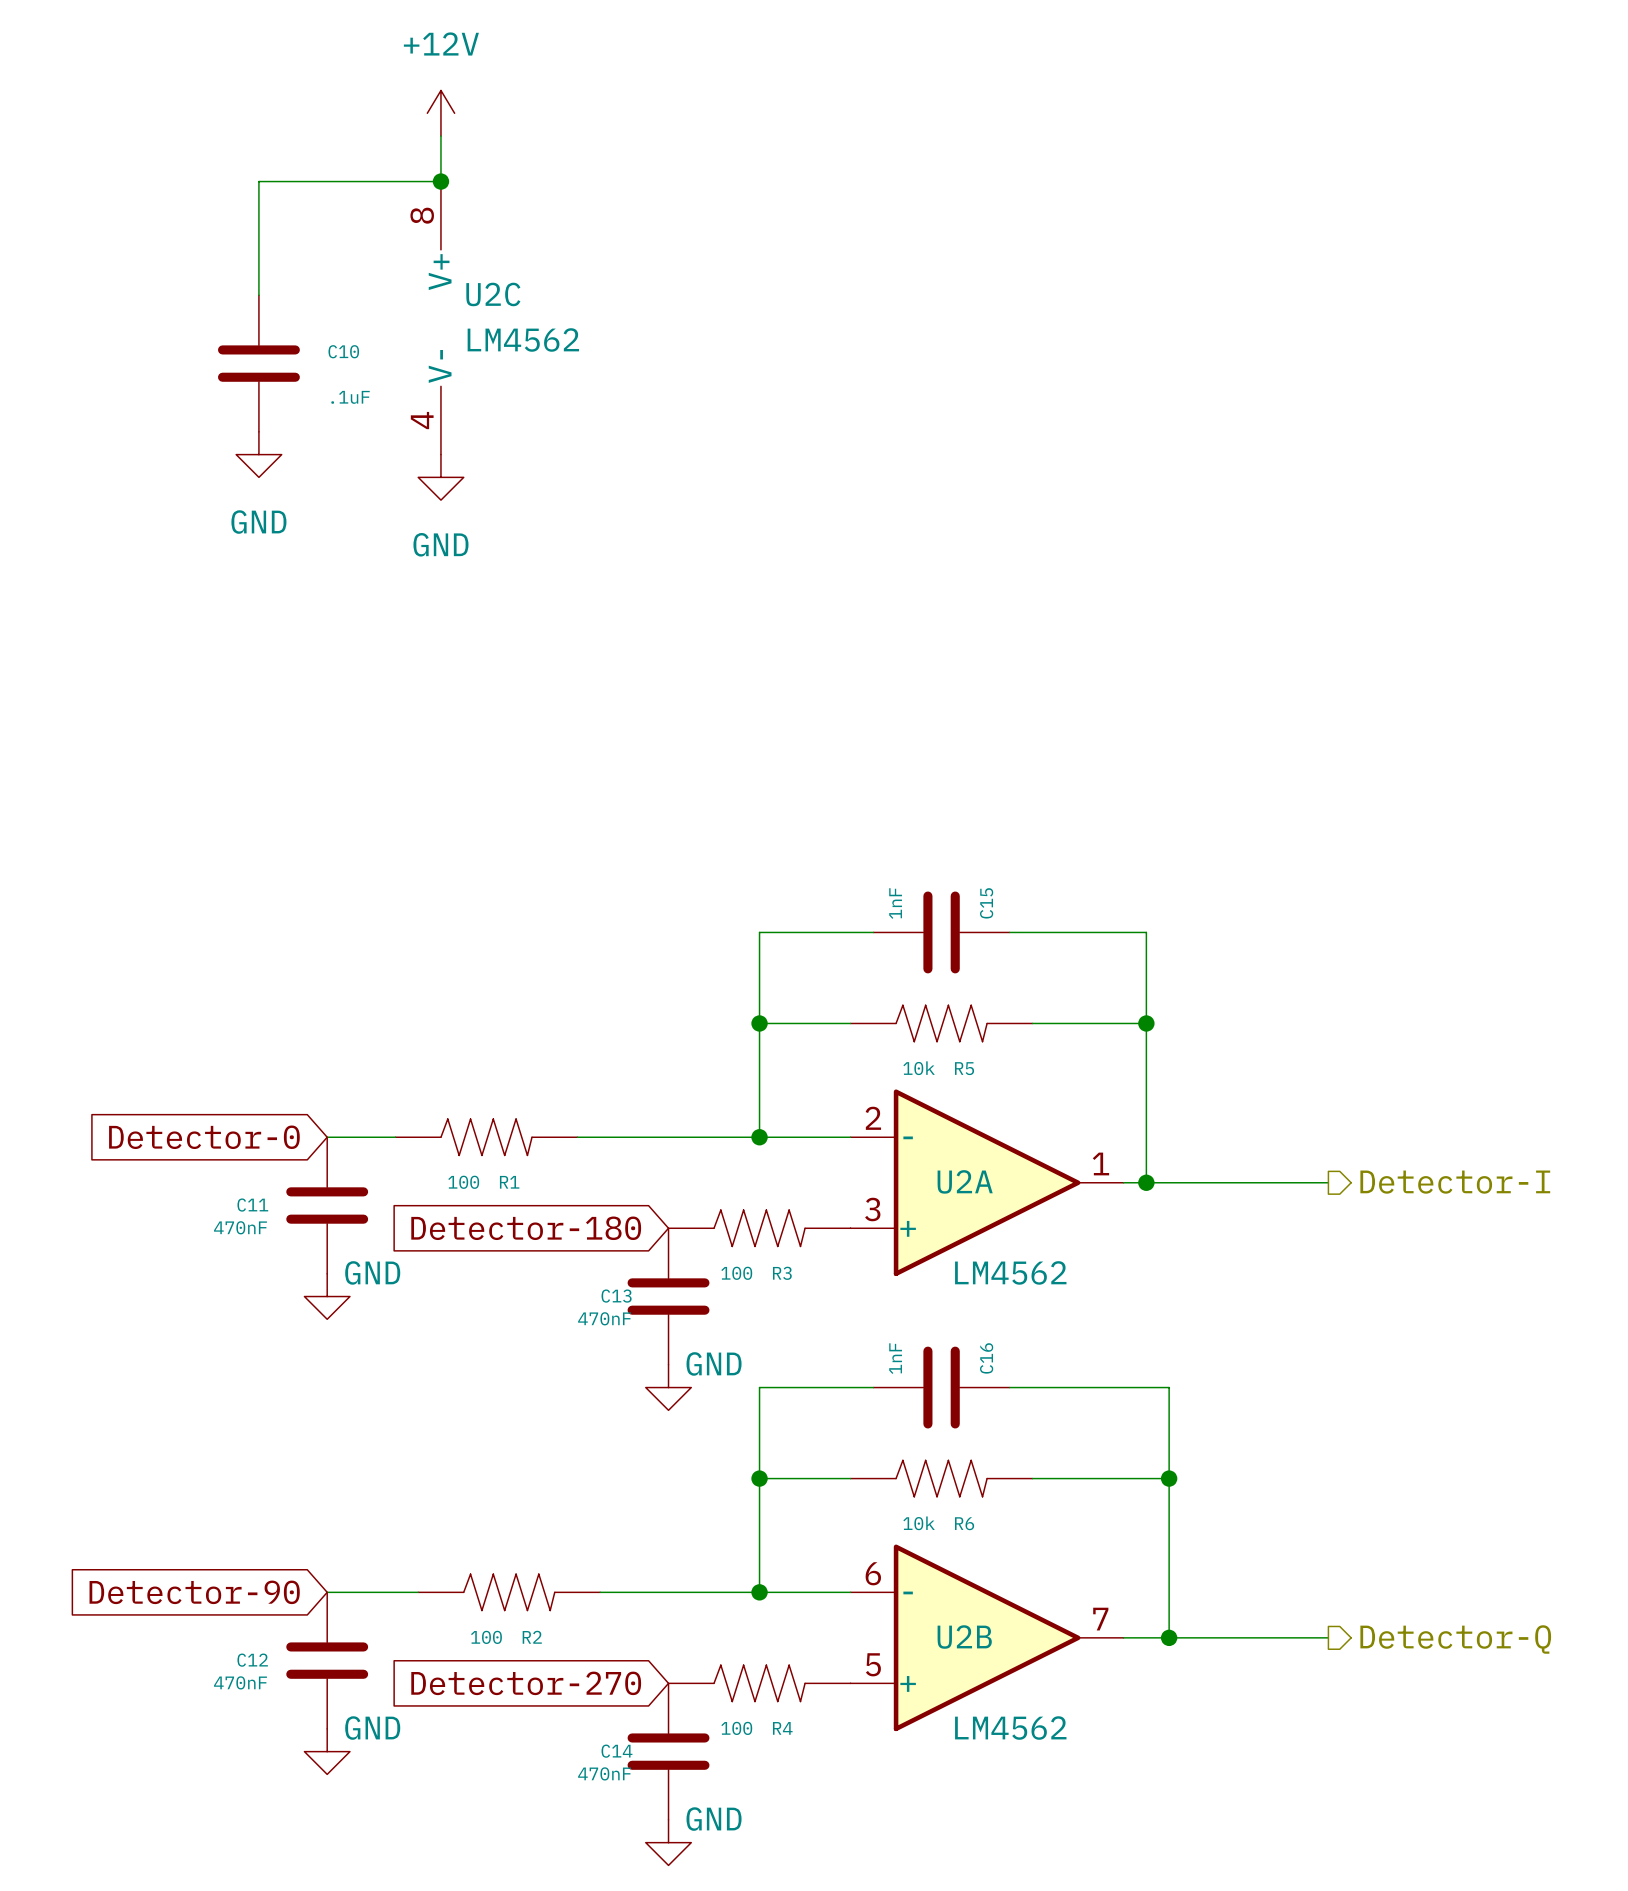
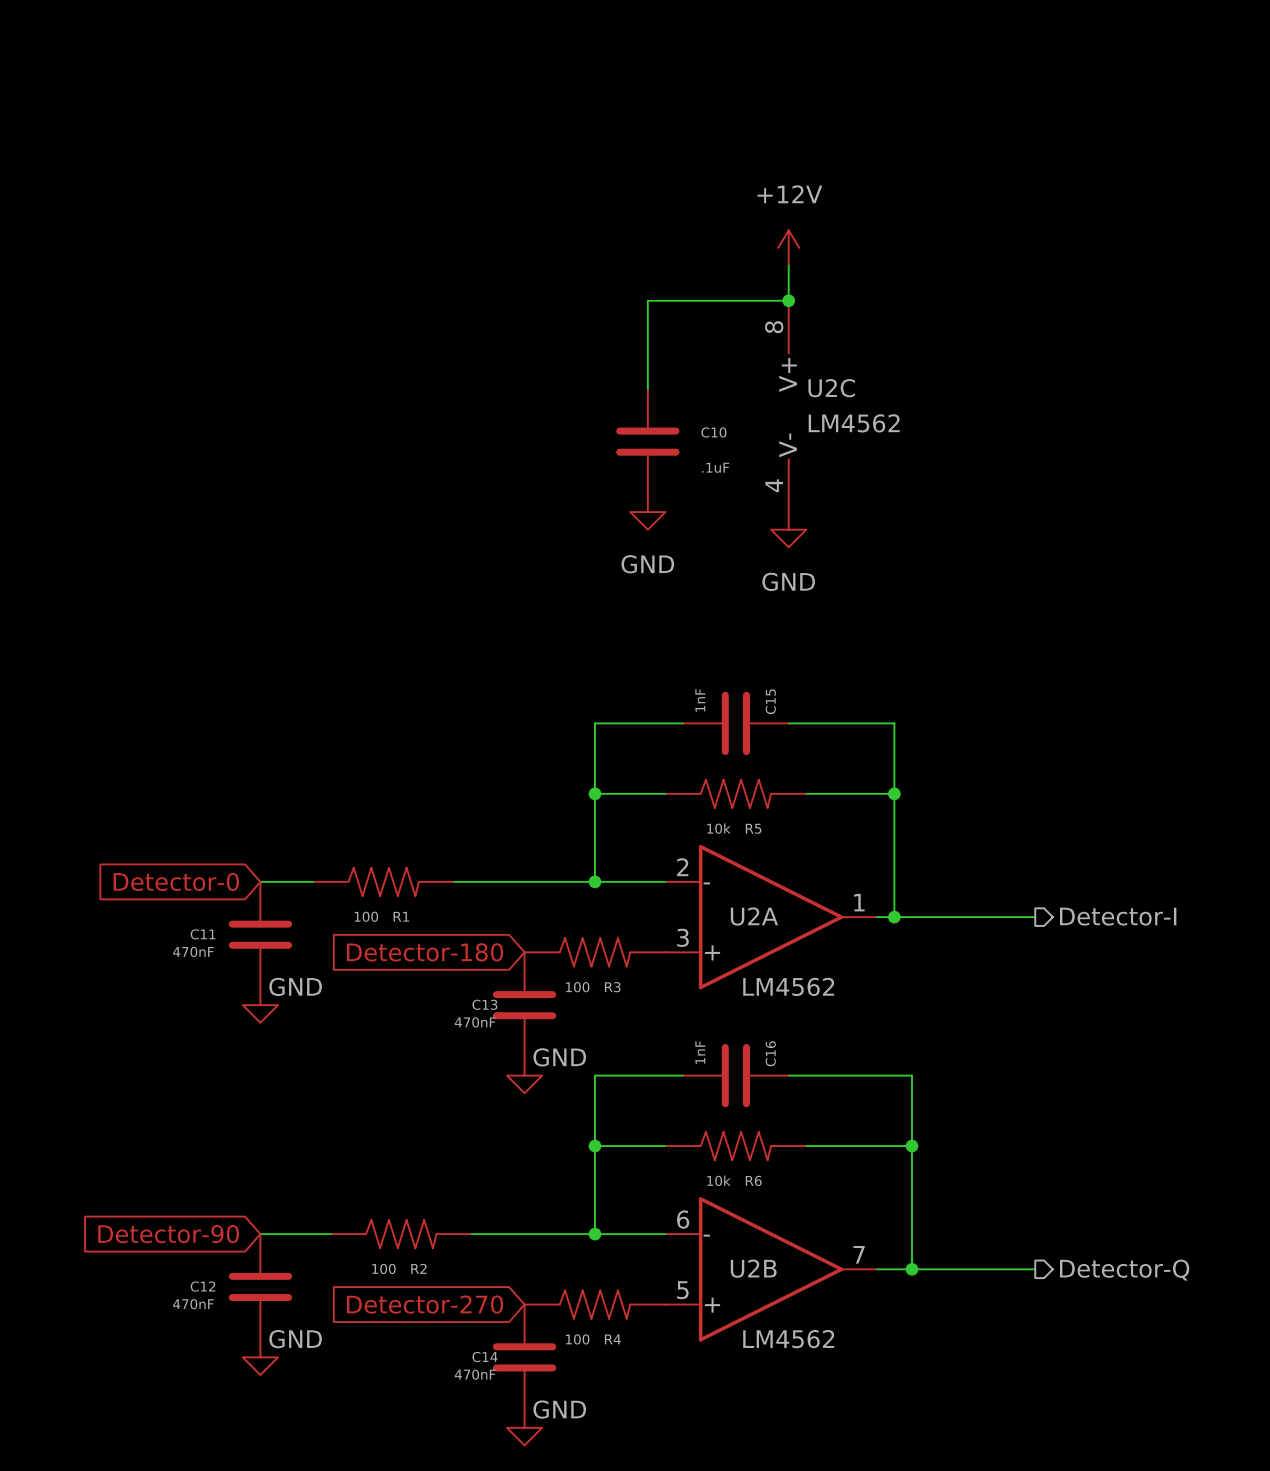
power symbol: +12V (440, 113) -> none
wire: (440, 136) (440, 181) (258, 181) (258, 295) -> none
junction: (440, 181) -> none
U2C position: (440, 318) -> (788, 406)
power symbol: none -> +12V (788, 247)
wire: none -> (788, 265) (788, 300) (647, 300) (647, 388)
C10 position: (258, 363) -> (647, 441)
junction: none -> (788, 300)
power symbol: GND (258, 454) -> none
power symbol: GND (440, 477) -> none
power symbol: none -> GND (647, 512)
power symbol: none -> GND (788, 529)

